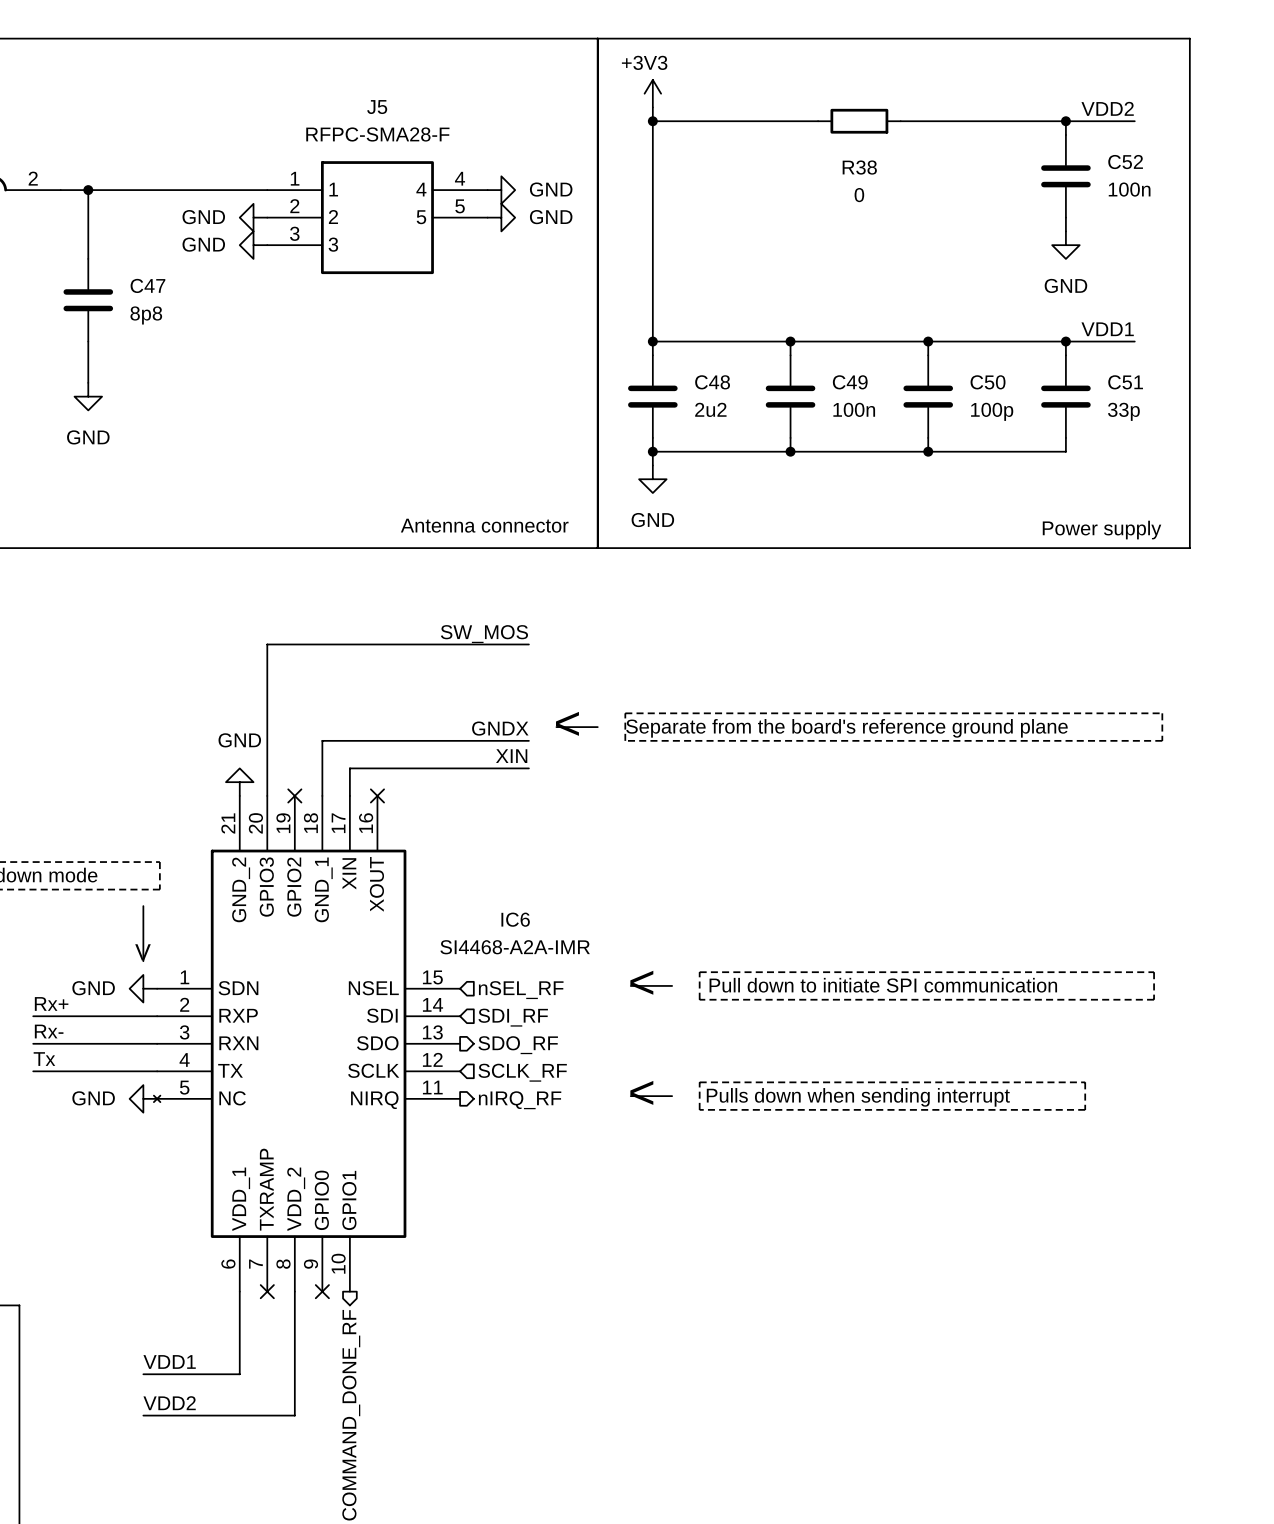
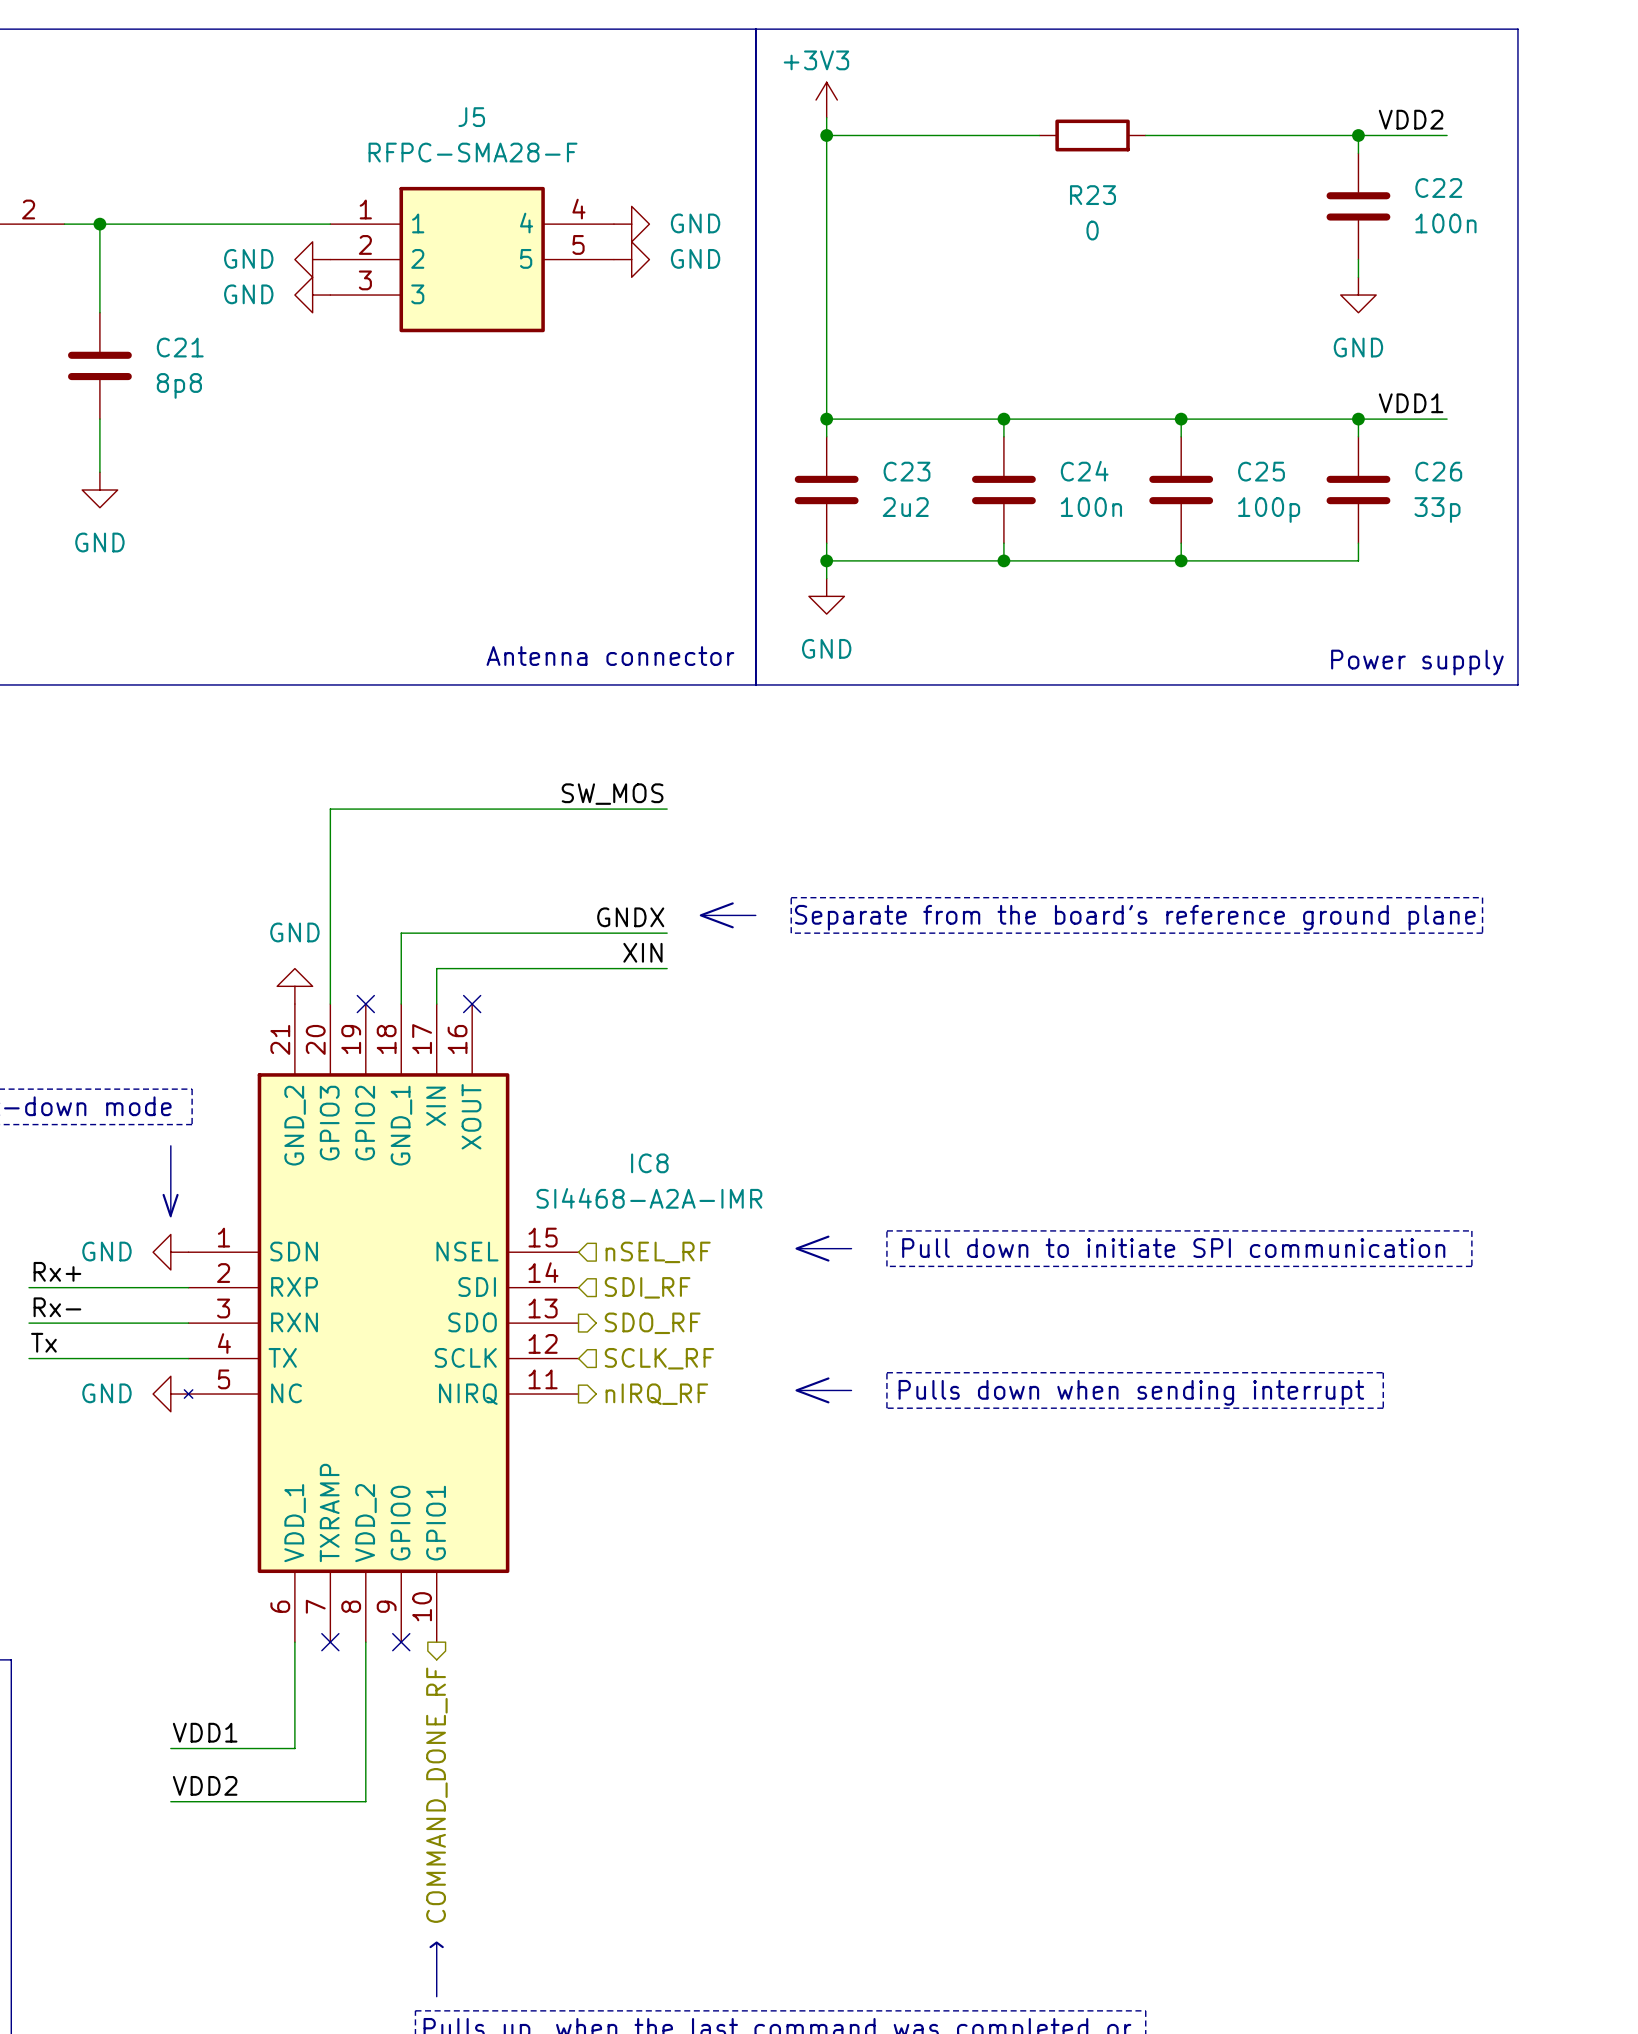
C52 name: C52 (1125, 162) -> C22 (1438, 188)
R38 name: R38 (859, 167) -> R23 (1092, 195)
C47 name: C47 (147, 285) -> C21 (180, 347)
C48 name: C48 (712, 382) -> C23 (907, 471)
C49 name: C49 (850, 382) -> C24 (1084, 471)
C50 name: C50 (988, 382) -> C25 (1261, 471)
C51 name: C51 (1125, 382) -> C26 (1438, 471)
IC6 name: IC6 (515, 919) -> IC8 (649, 1163)

